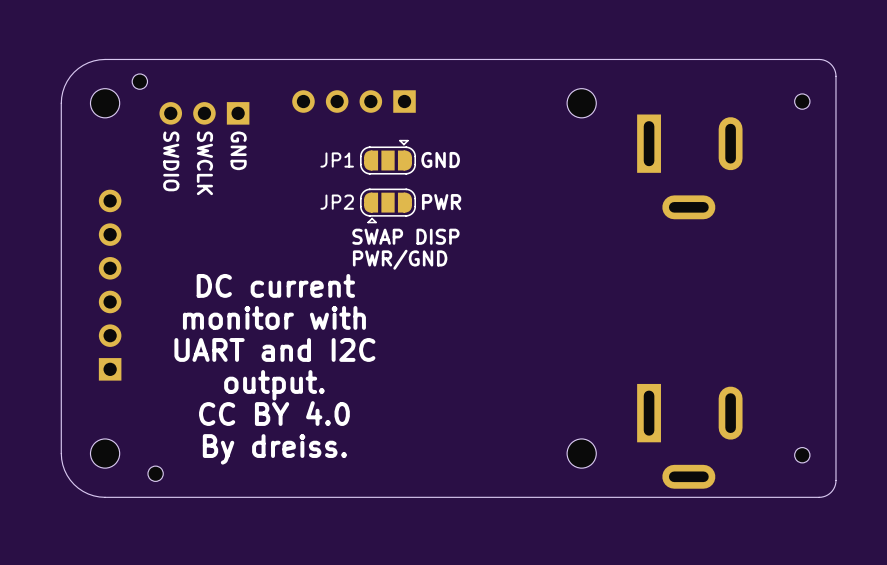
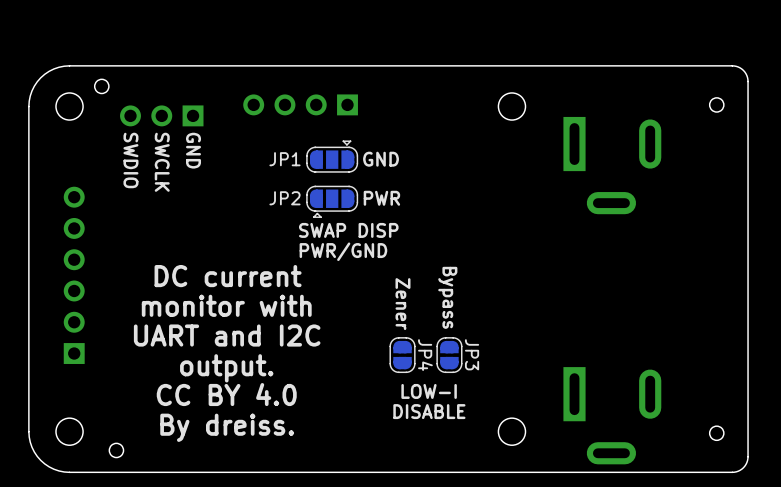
text: none -> Bypass (447, 297)
text: none -> Zener (402, 304)
JP4: none -> (402, 355)
JP3: none -> (449, 355)
text: none -> LOW-I (429, 391)
text: none -> DISABLE (429, 411)

